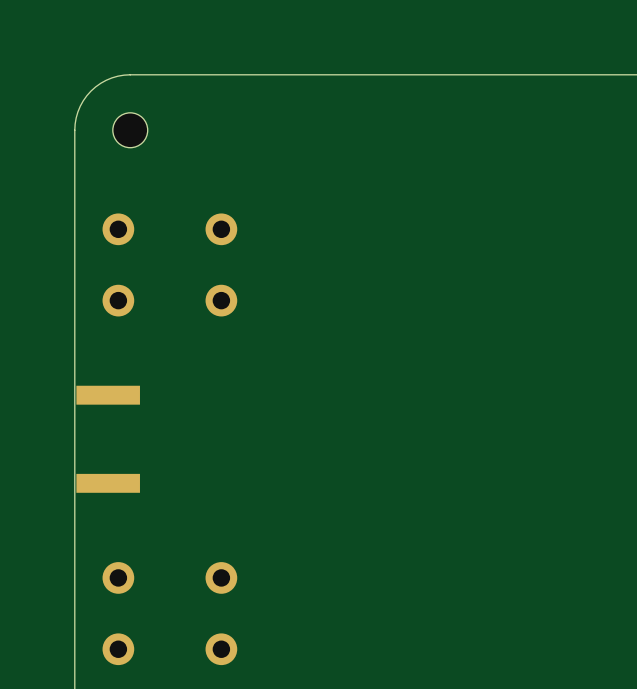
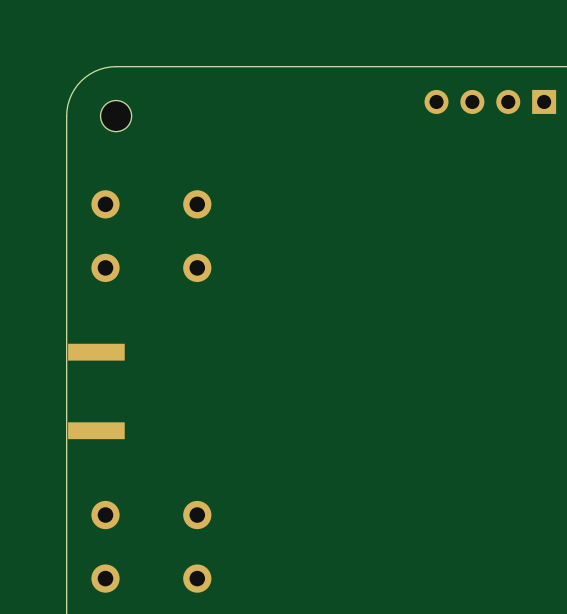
part: none -> (490, 101)

